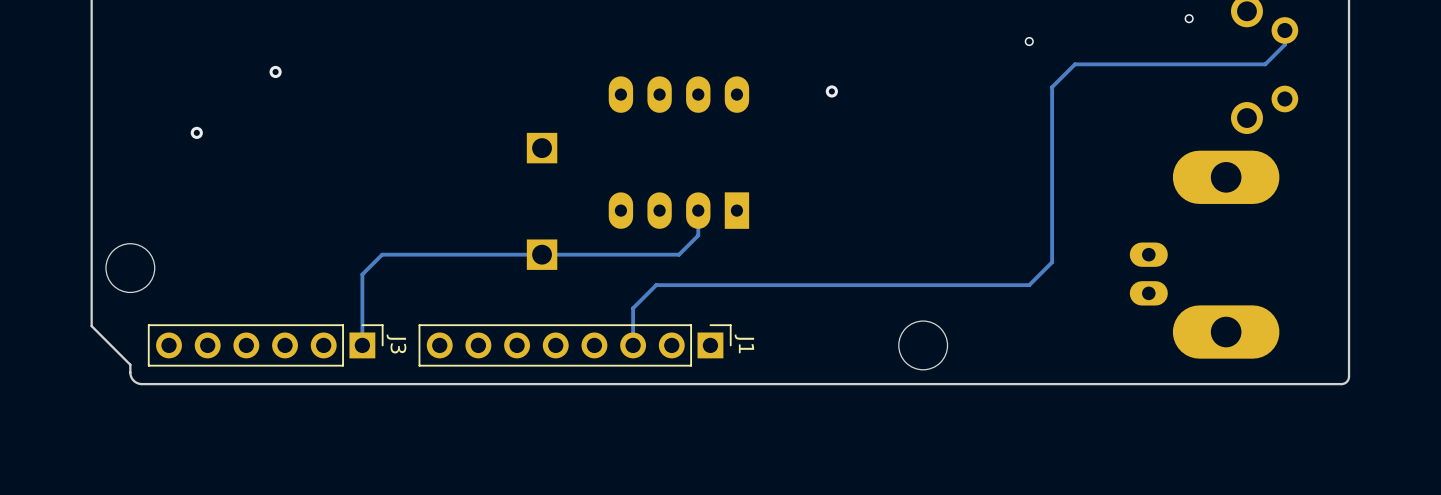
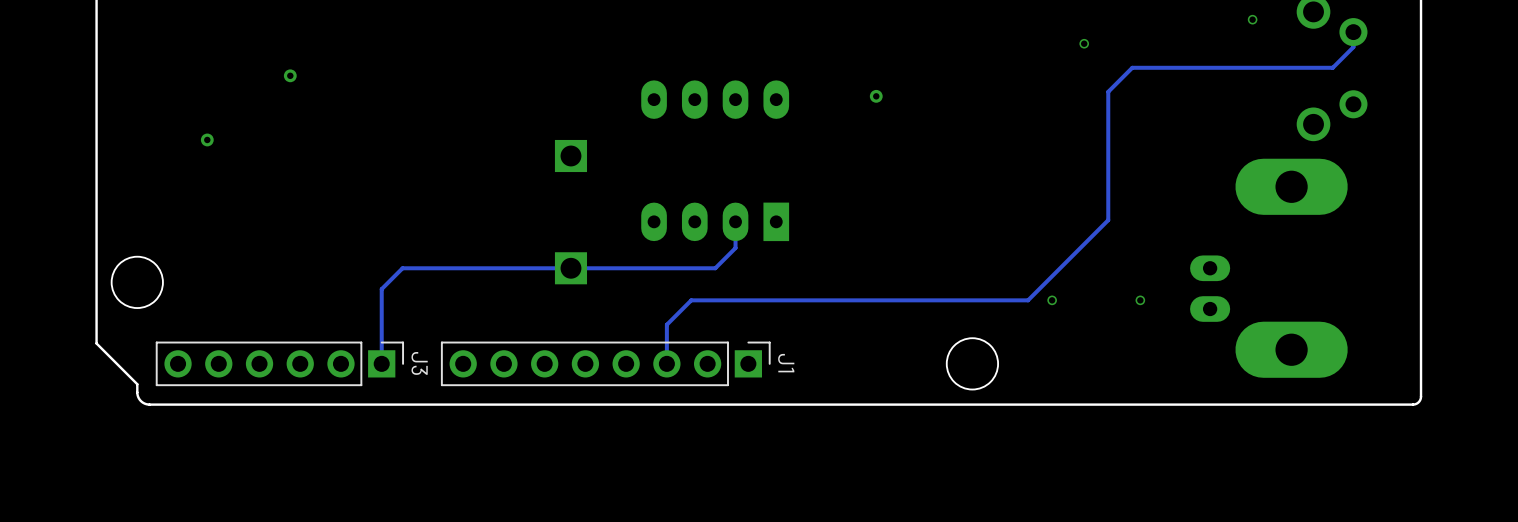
track: (1052, 209) (1052, 262) (1029, 285) (975, 285) -> (1108, 220) (1028, 300)
via: none -> (1052, 300)
via: none -> (1140, 300)

